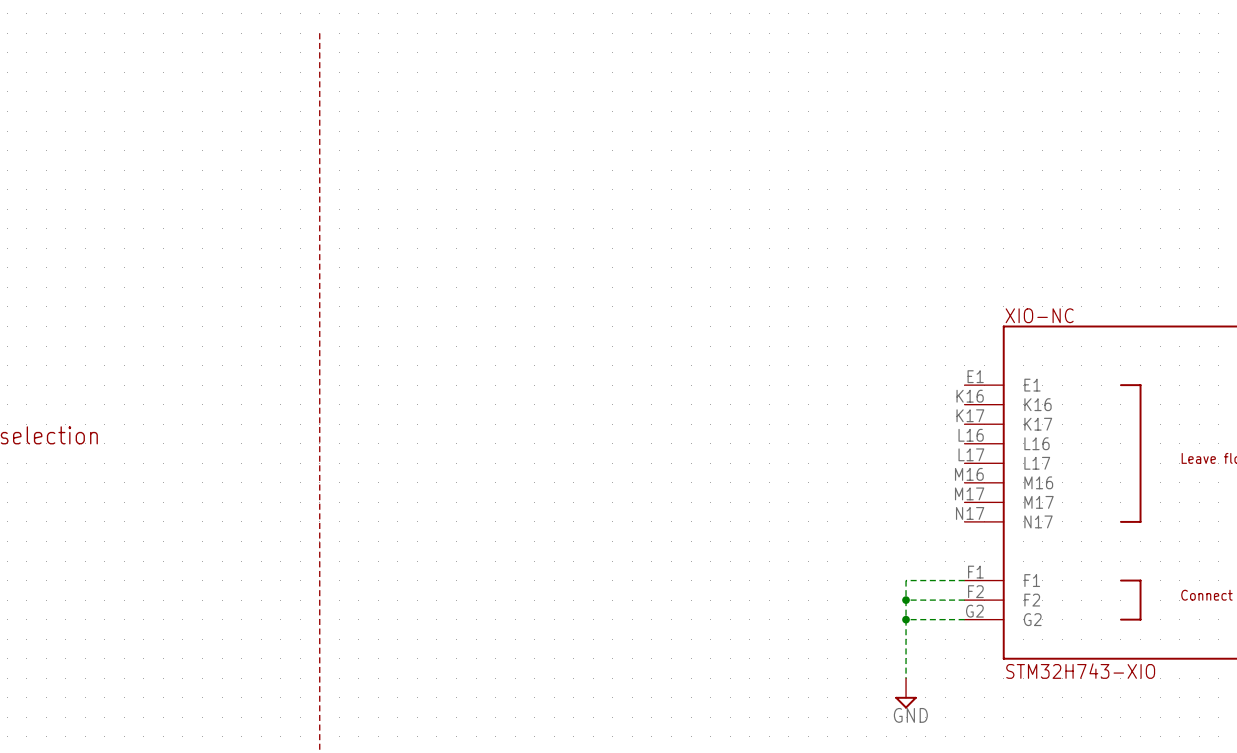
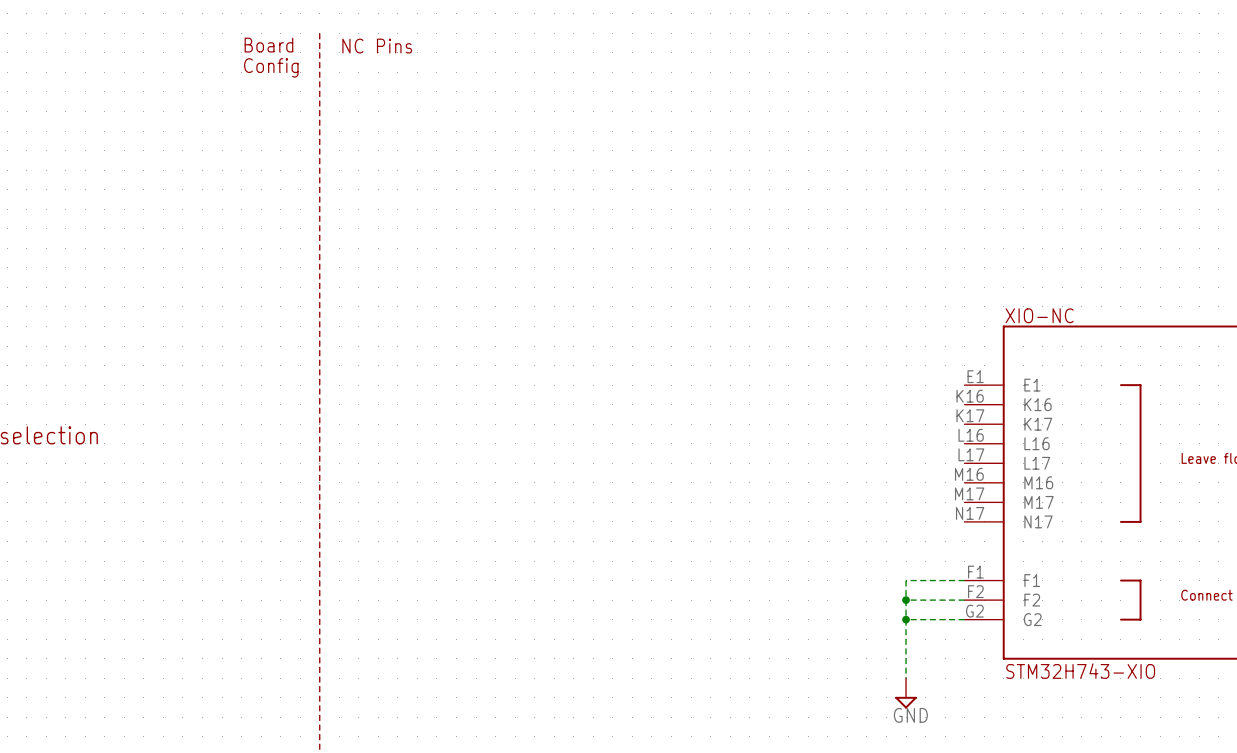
text: none -> Board (268, 45)
text: none -> NC Pins (377, 46)
text: none -> Config (271, 67)

